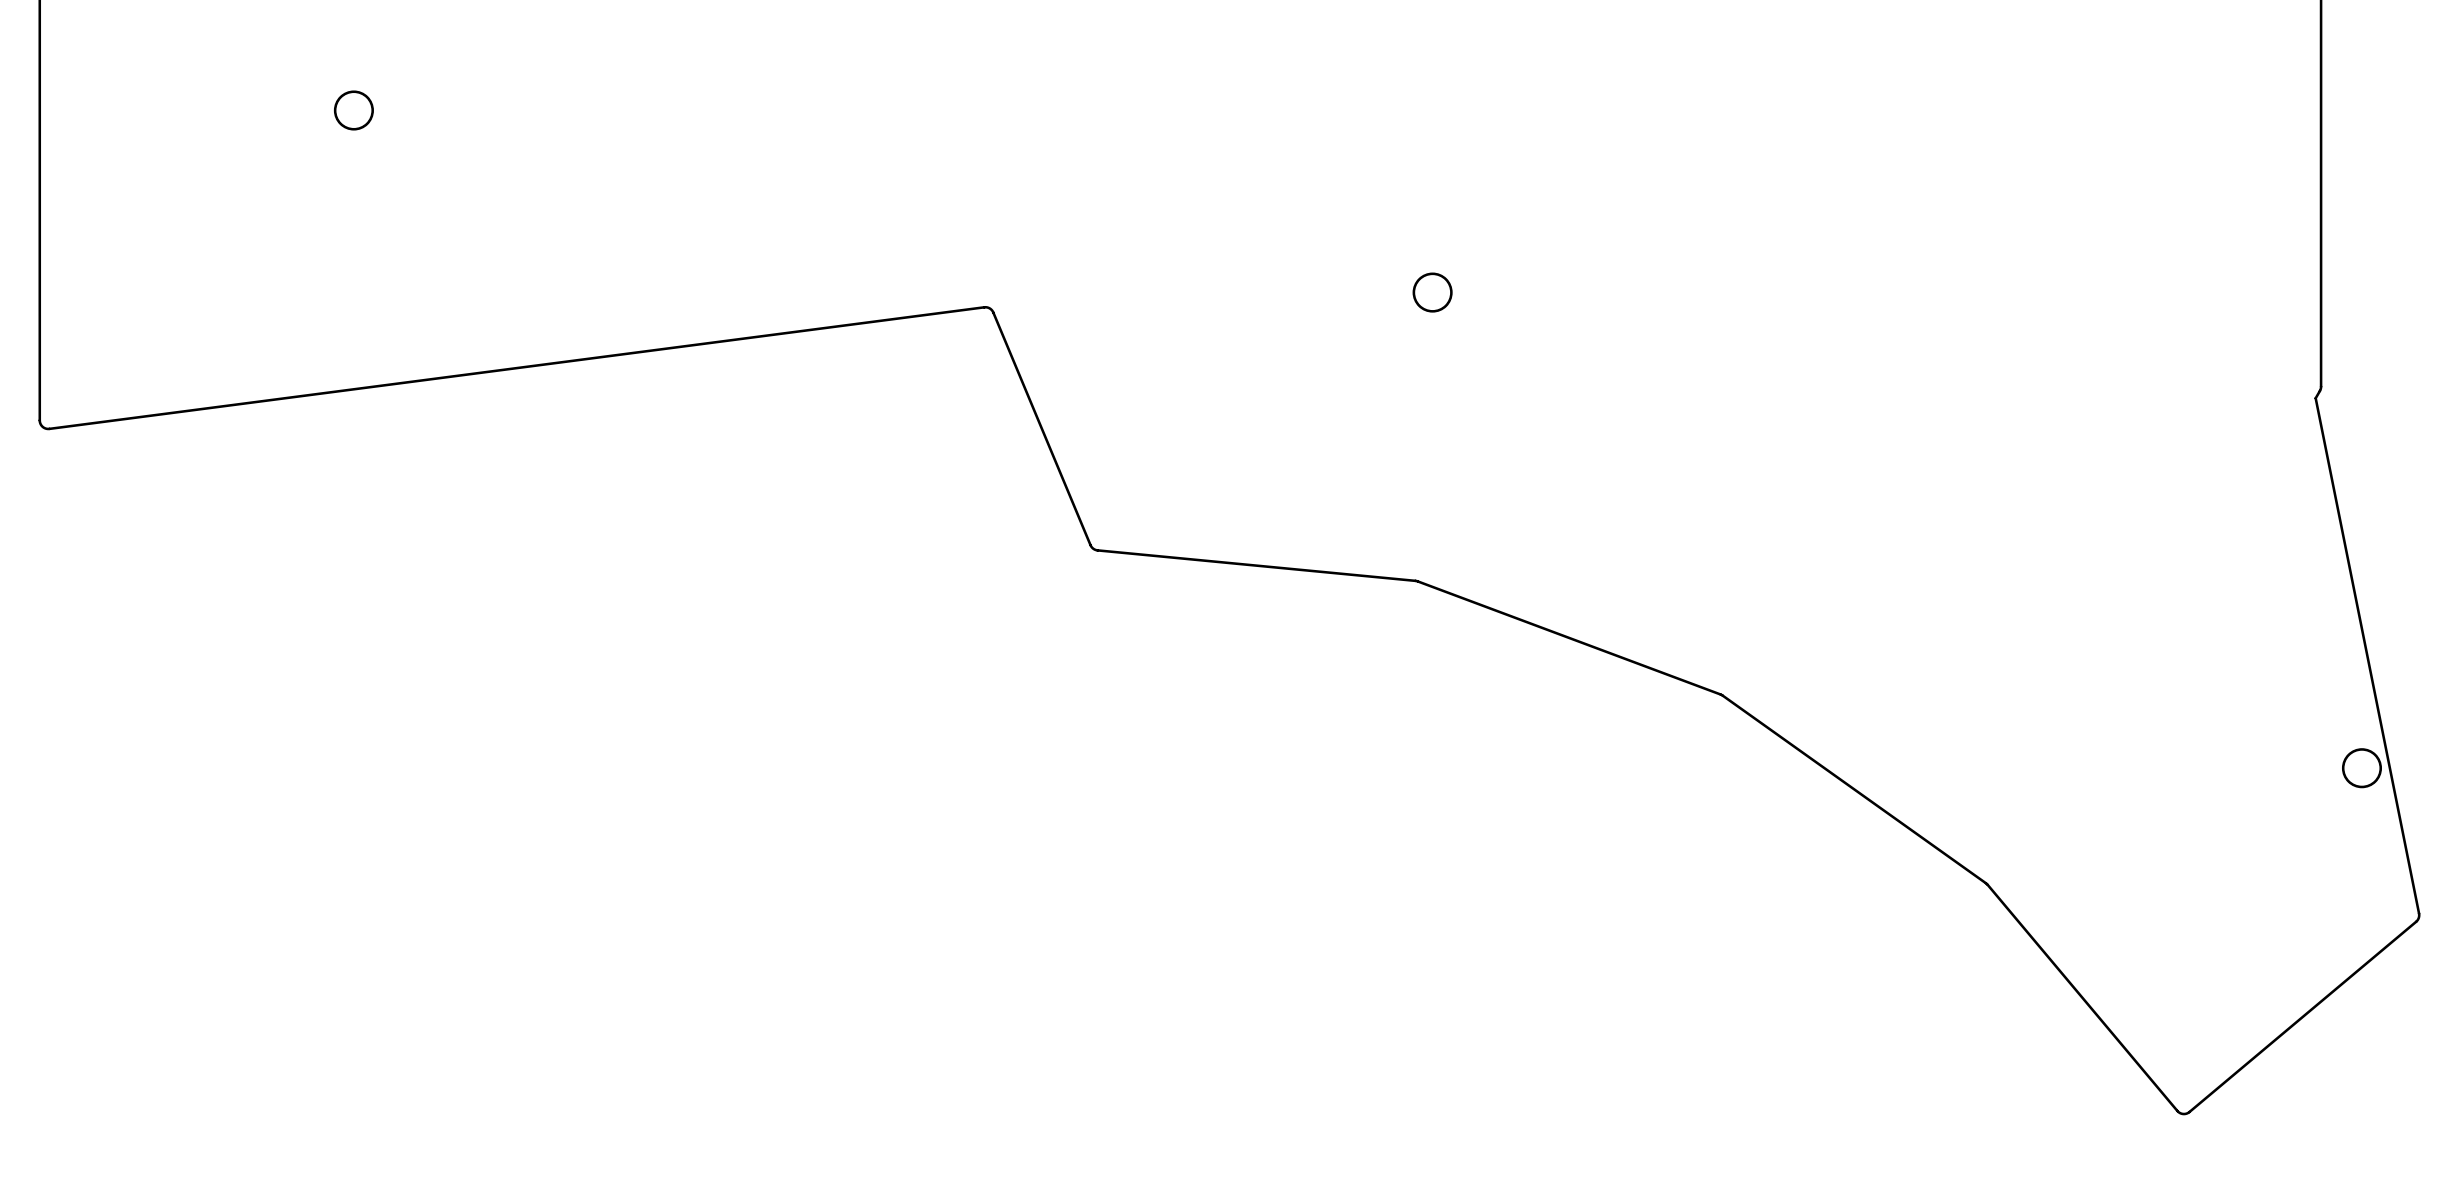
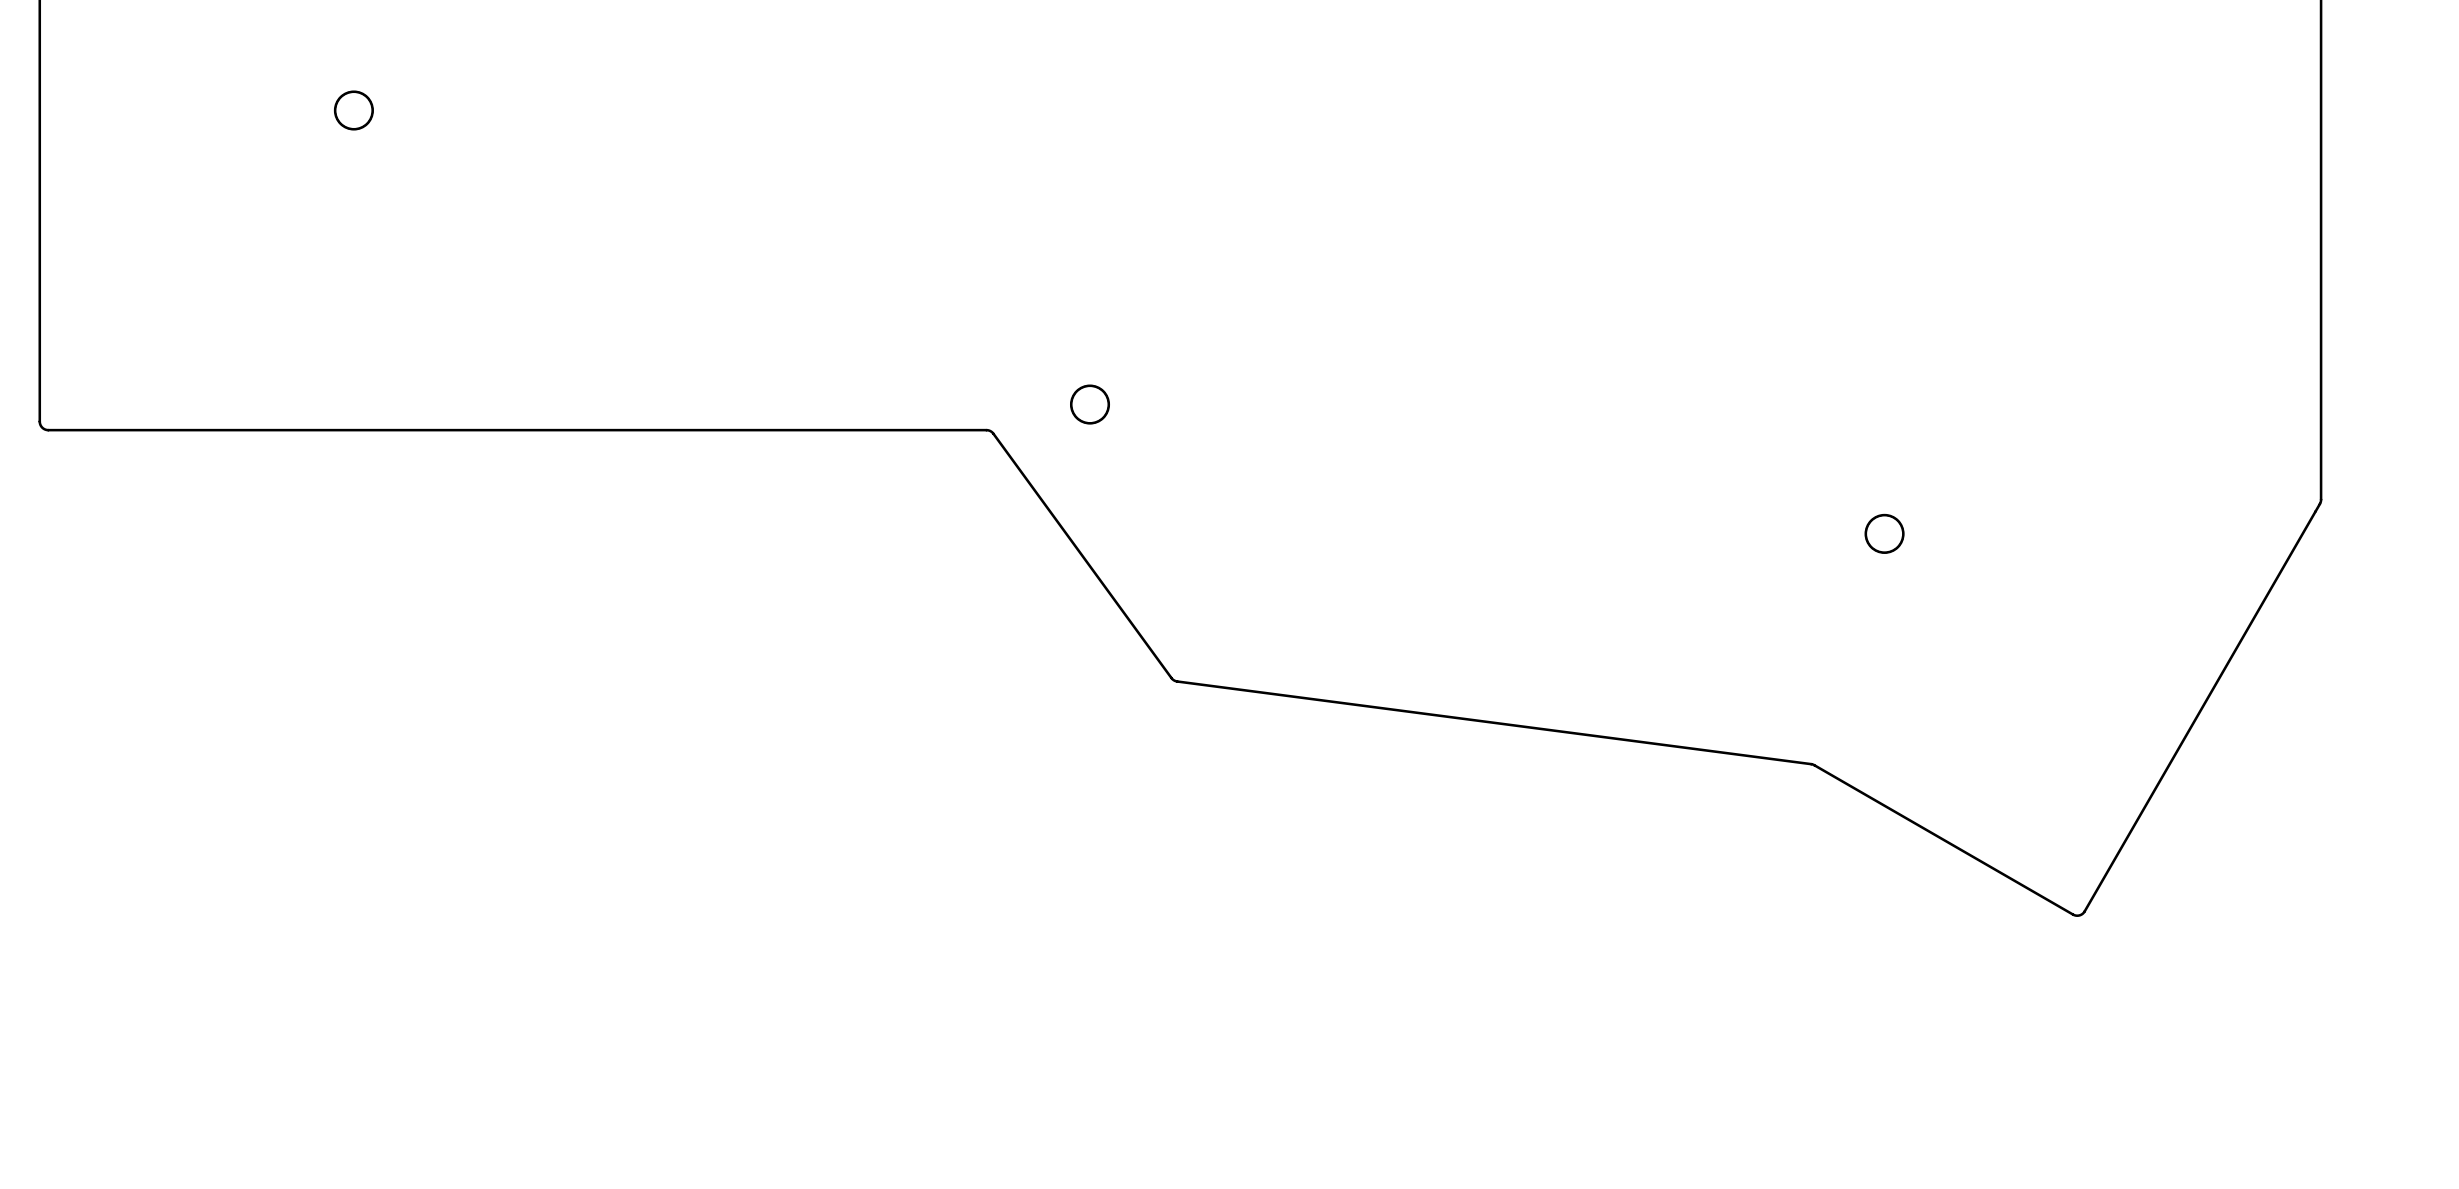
round board edge: [1412, 272, 1453, 313] -> none
round board edge: none -> [1069, 384, 1111, 425]
board edge: (2321, 386) (2315, 398) (2419, 917) (2416, 921) (2189, 1112) (2184, 1114) (2177, 1110) (1986, 883) (1721, 694) (1416, 581) (1093, 548) (993, 312) (987, 307) (49, 428) (42, 426) (39, 420) -> (2321, 386) (2320, 503) (2084, 911) (2077, 915) (1812, 764) (1174, 680) (993, 433) (988, 430) (48, 430) (42, 427) (39, 420)
round board edge: none -> [1864, 513, 1905, 554]
round board edge: [2341, 748, 2383, 789] -> none

